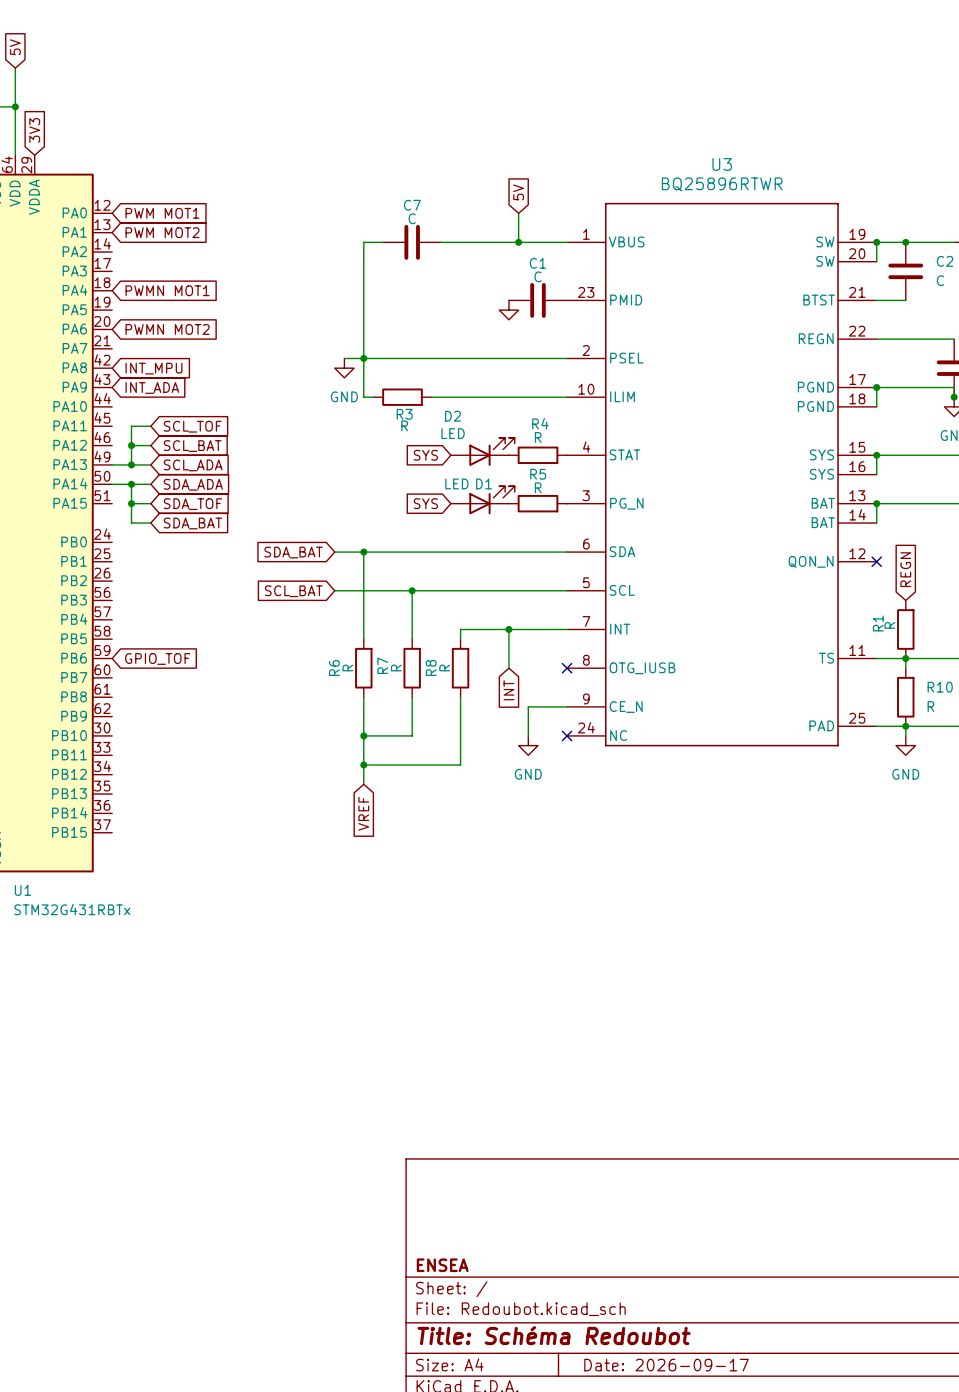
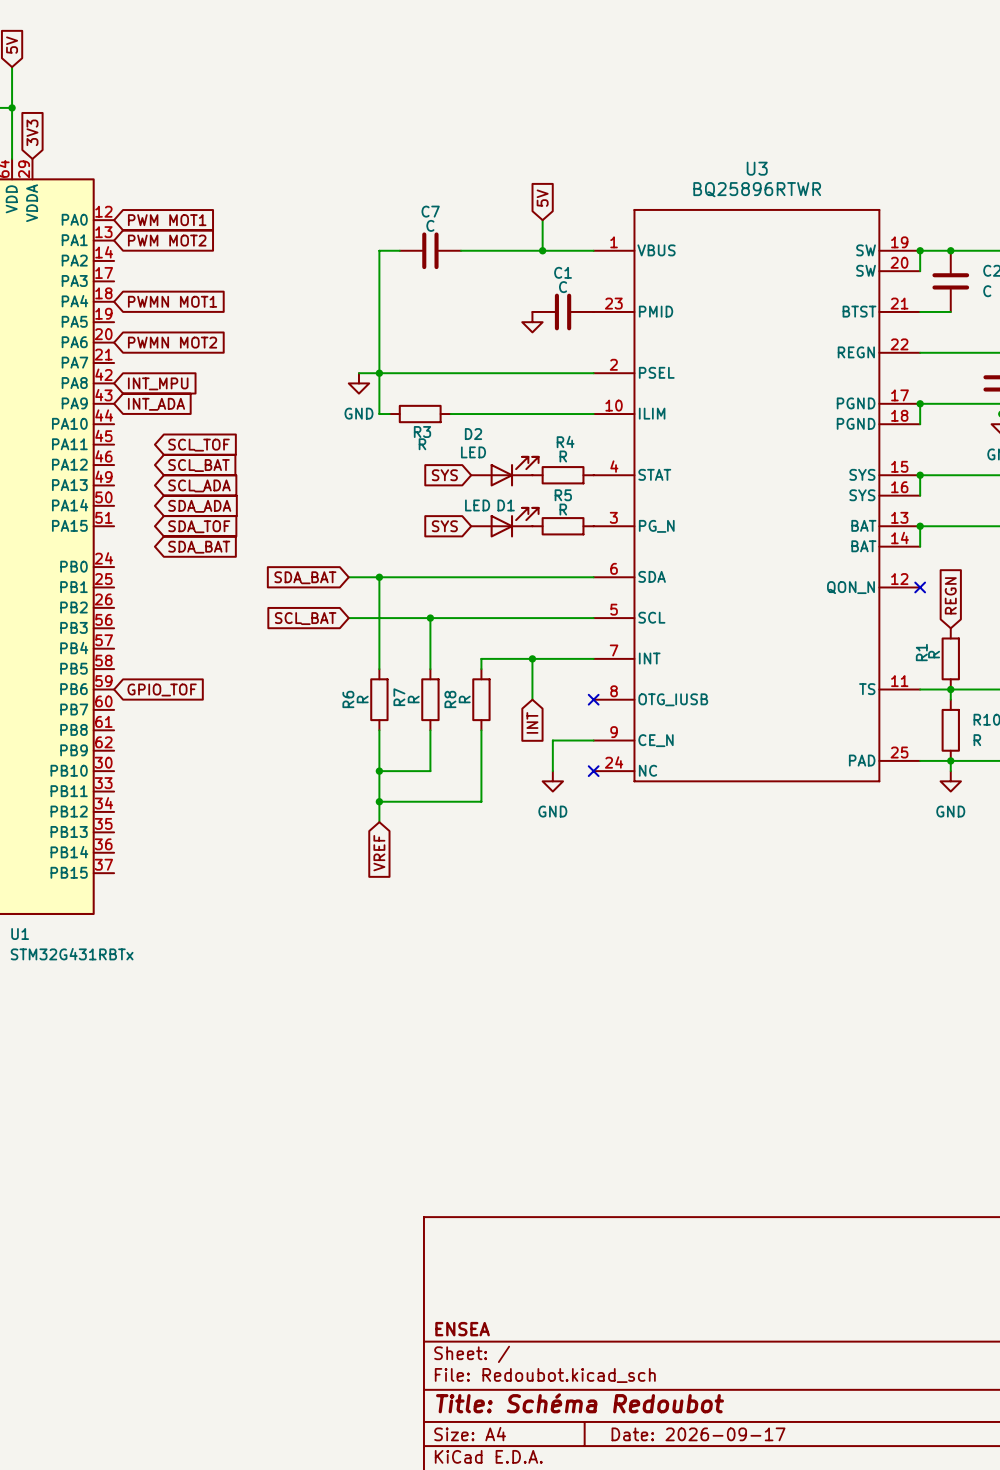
wire: (150, 426) (131, 426) (131, 464) -> none
wire: (131, 445) (150, 445) -> none
junction: (131, 445) -> none
wire: (112, 464) (150, 464) -> none
junction: (131, 464) -> none
wire: (112, 484) (150, 484) -> none
wire: (131, 484) (131, 523) (150, 523) -> none
junction: (131, 484) -> none
wire: (131, 503) (150, 503) -> none
junction: (131, 503) -> none

